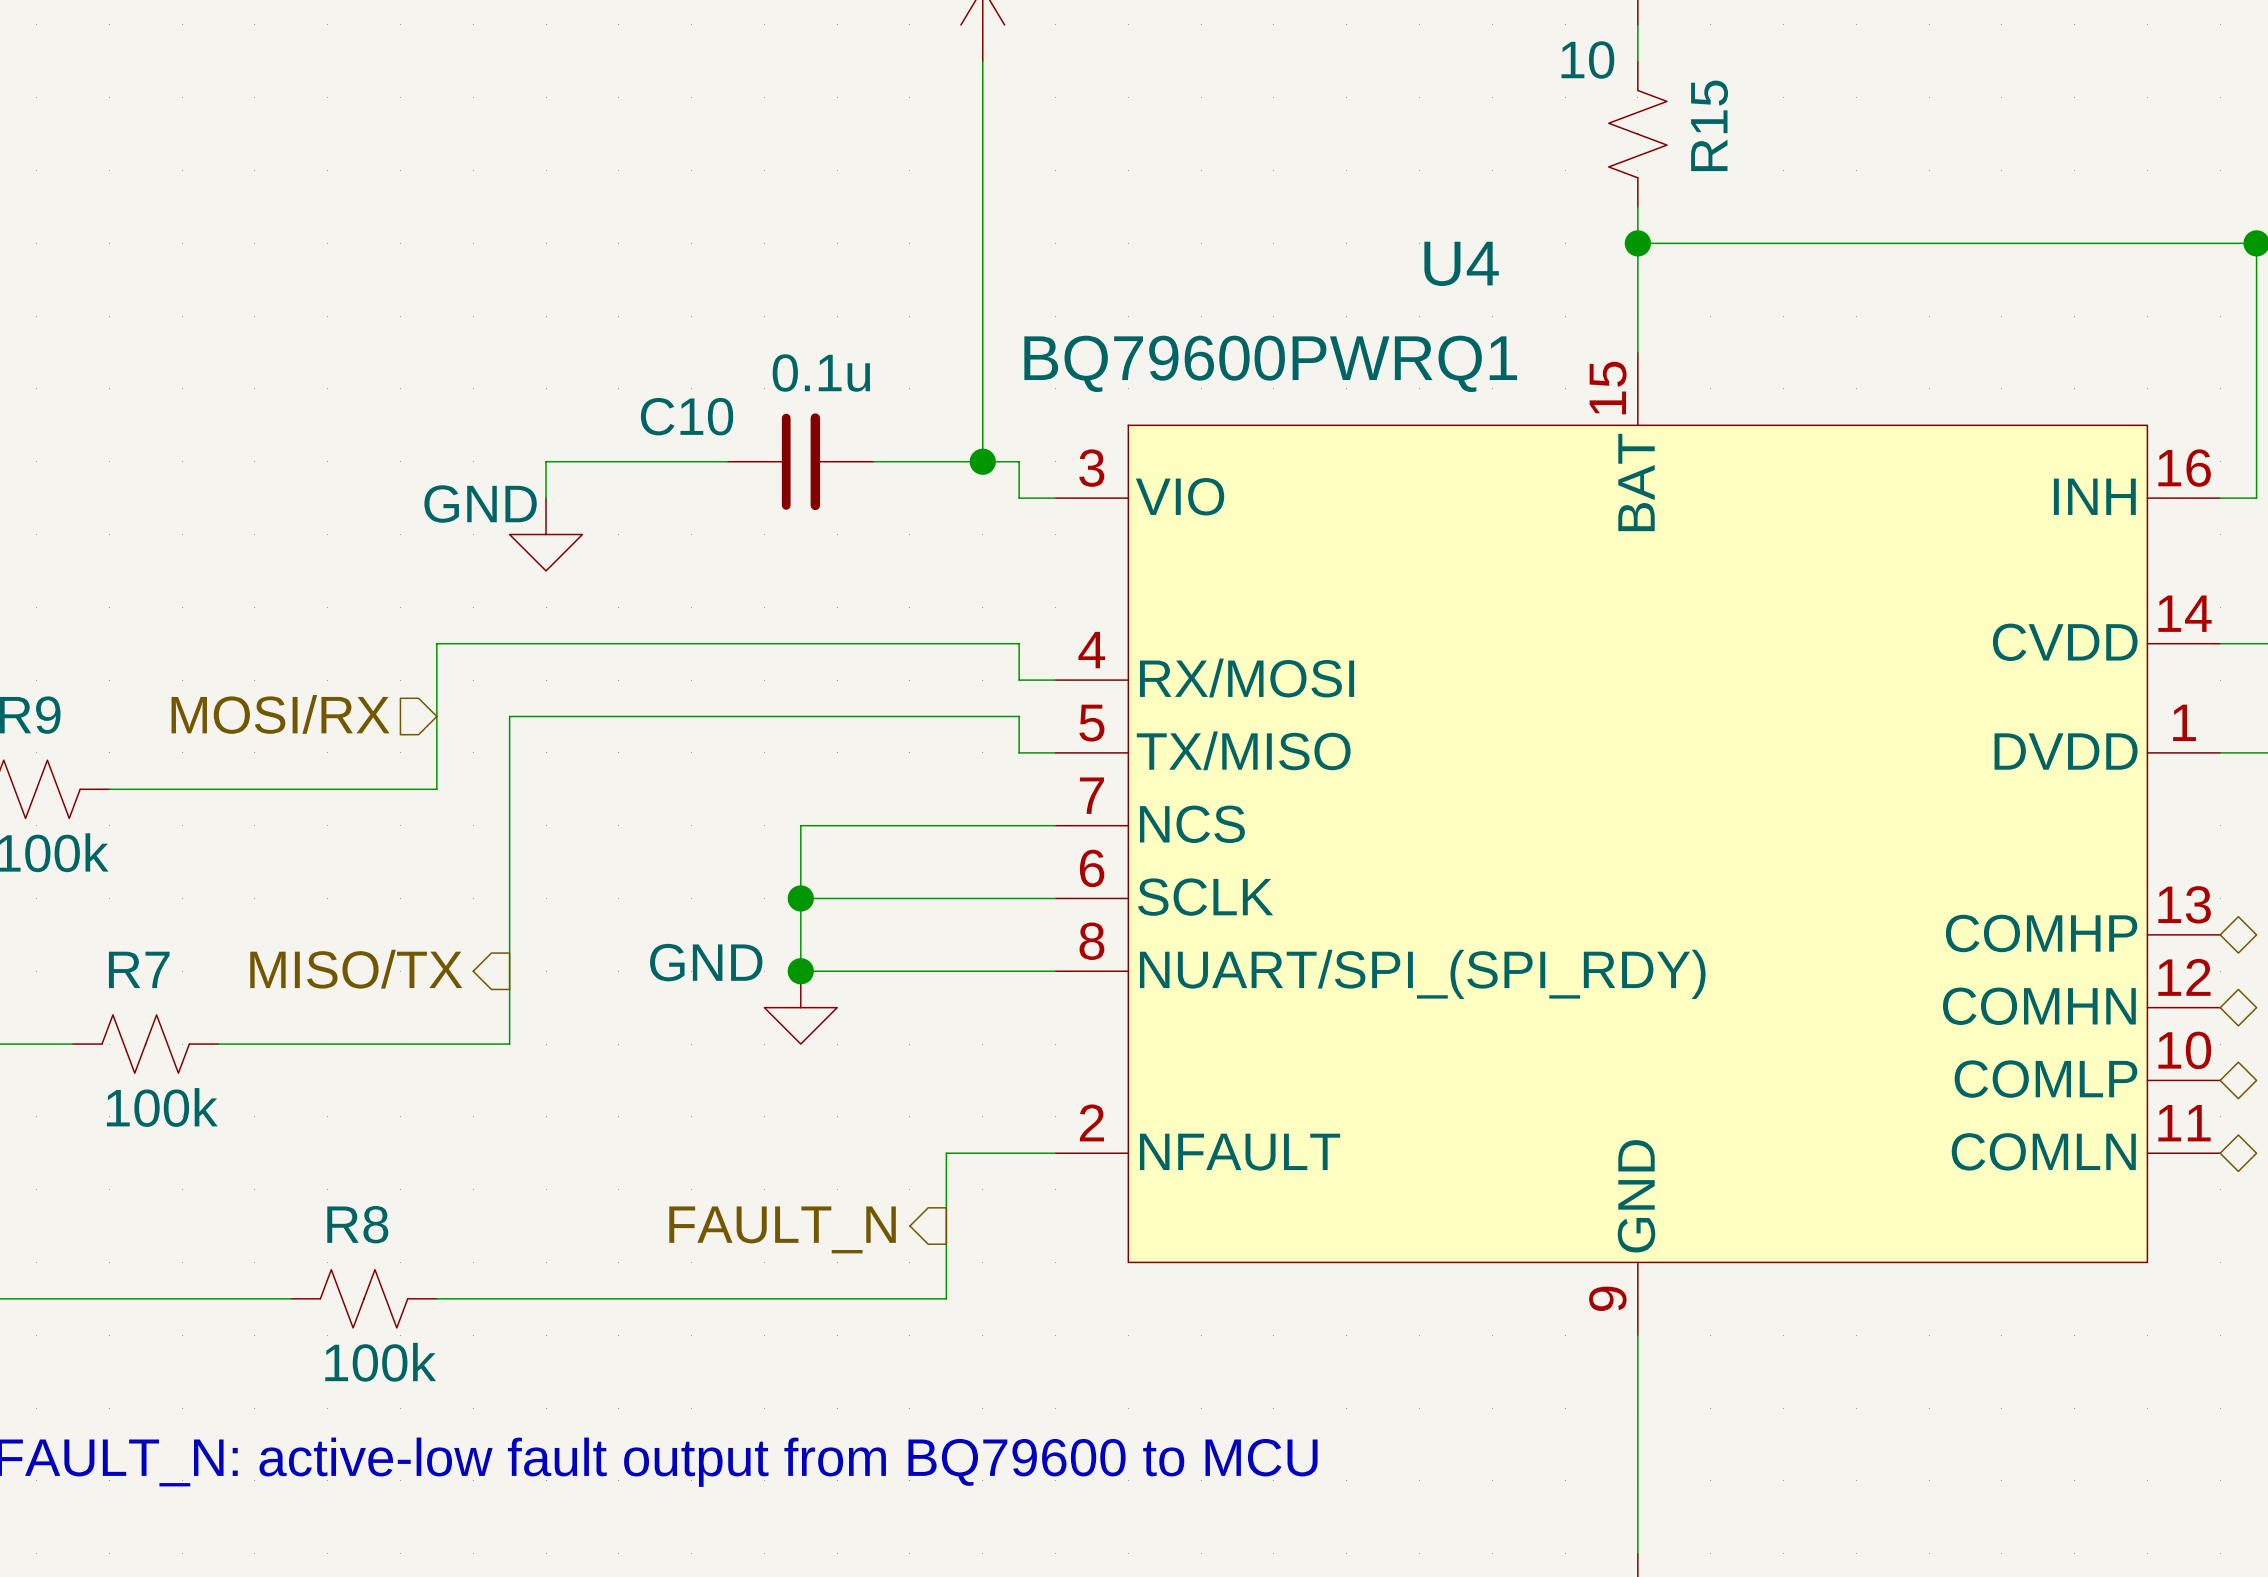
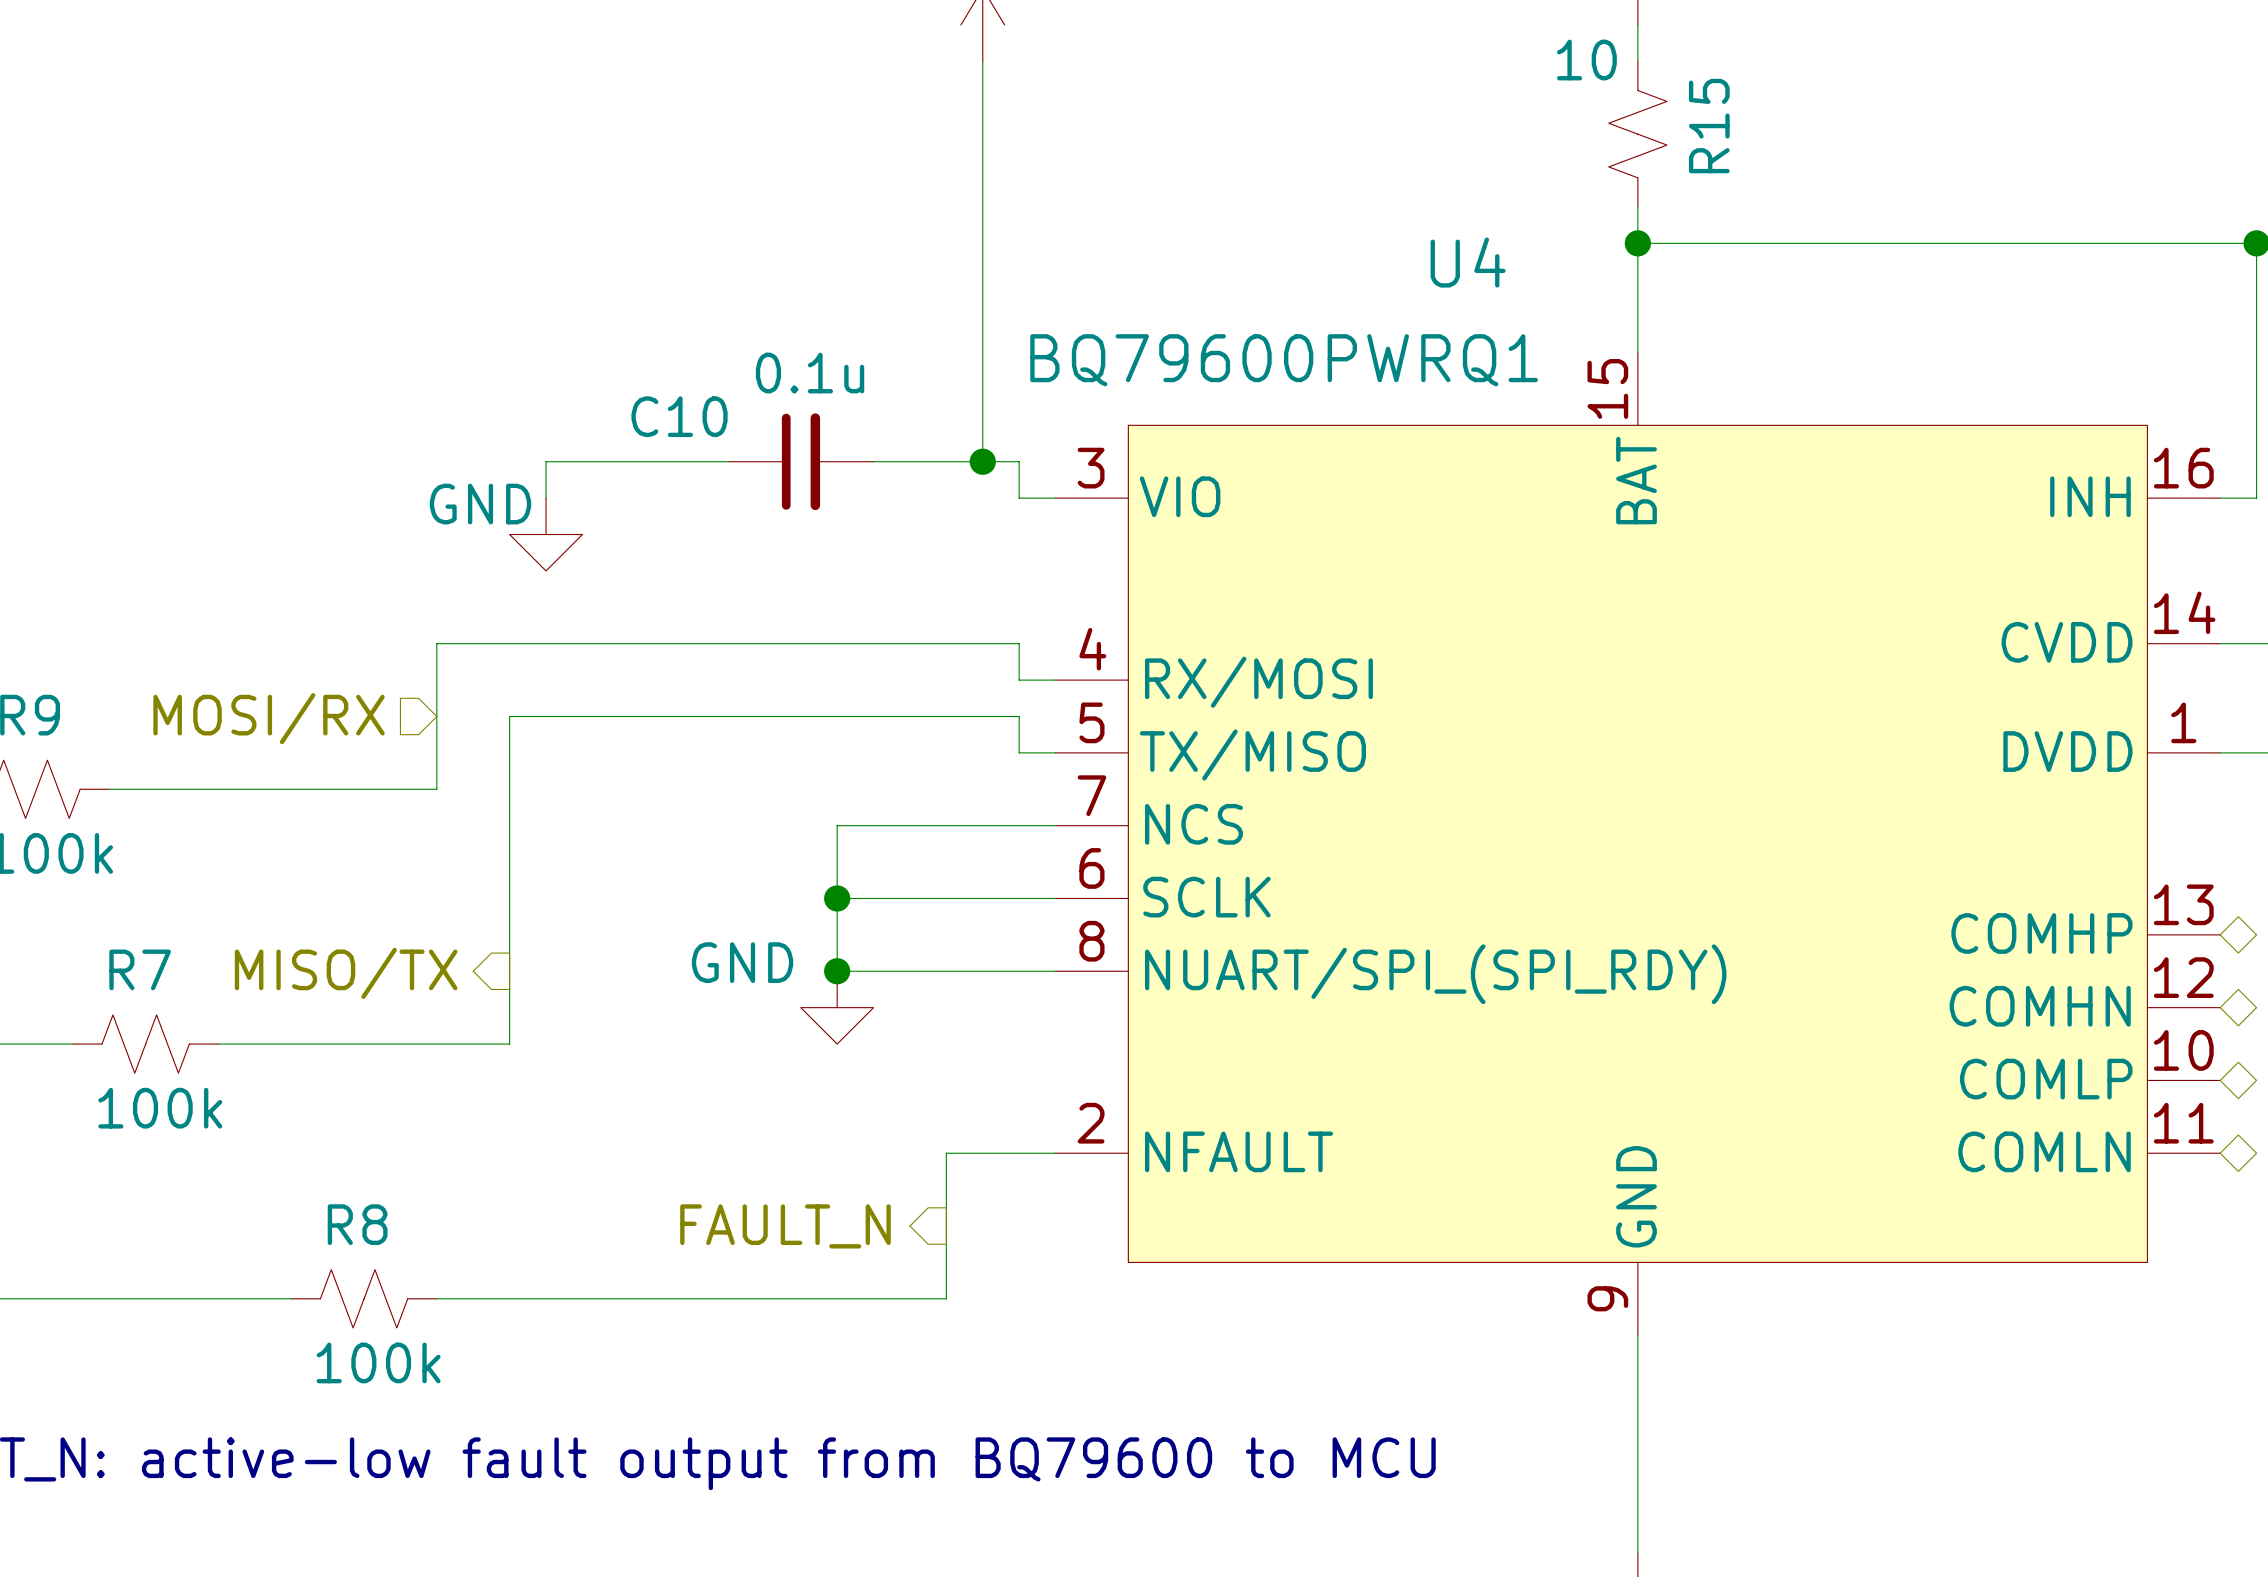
wire: (837, 825) (800, 825) (800, 971) (837, 971) -> (837, 825) (837, 971)
wire: (800, 898) (837, 898) -> none
junction position: (800, 898) -> (837, 898)
junction position: (800, 971) -> (837, 971)
power symbol position: GND (800, 1007) -> GND (837, 1007)

